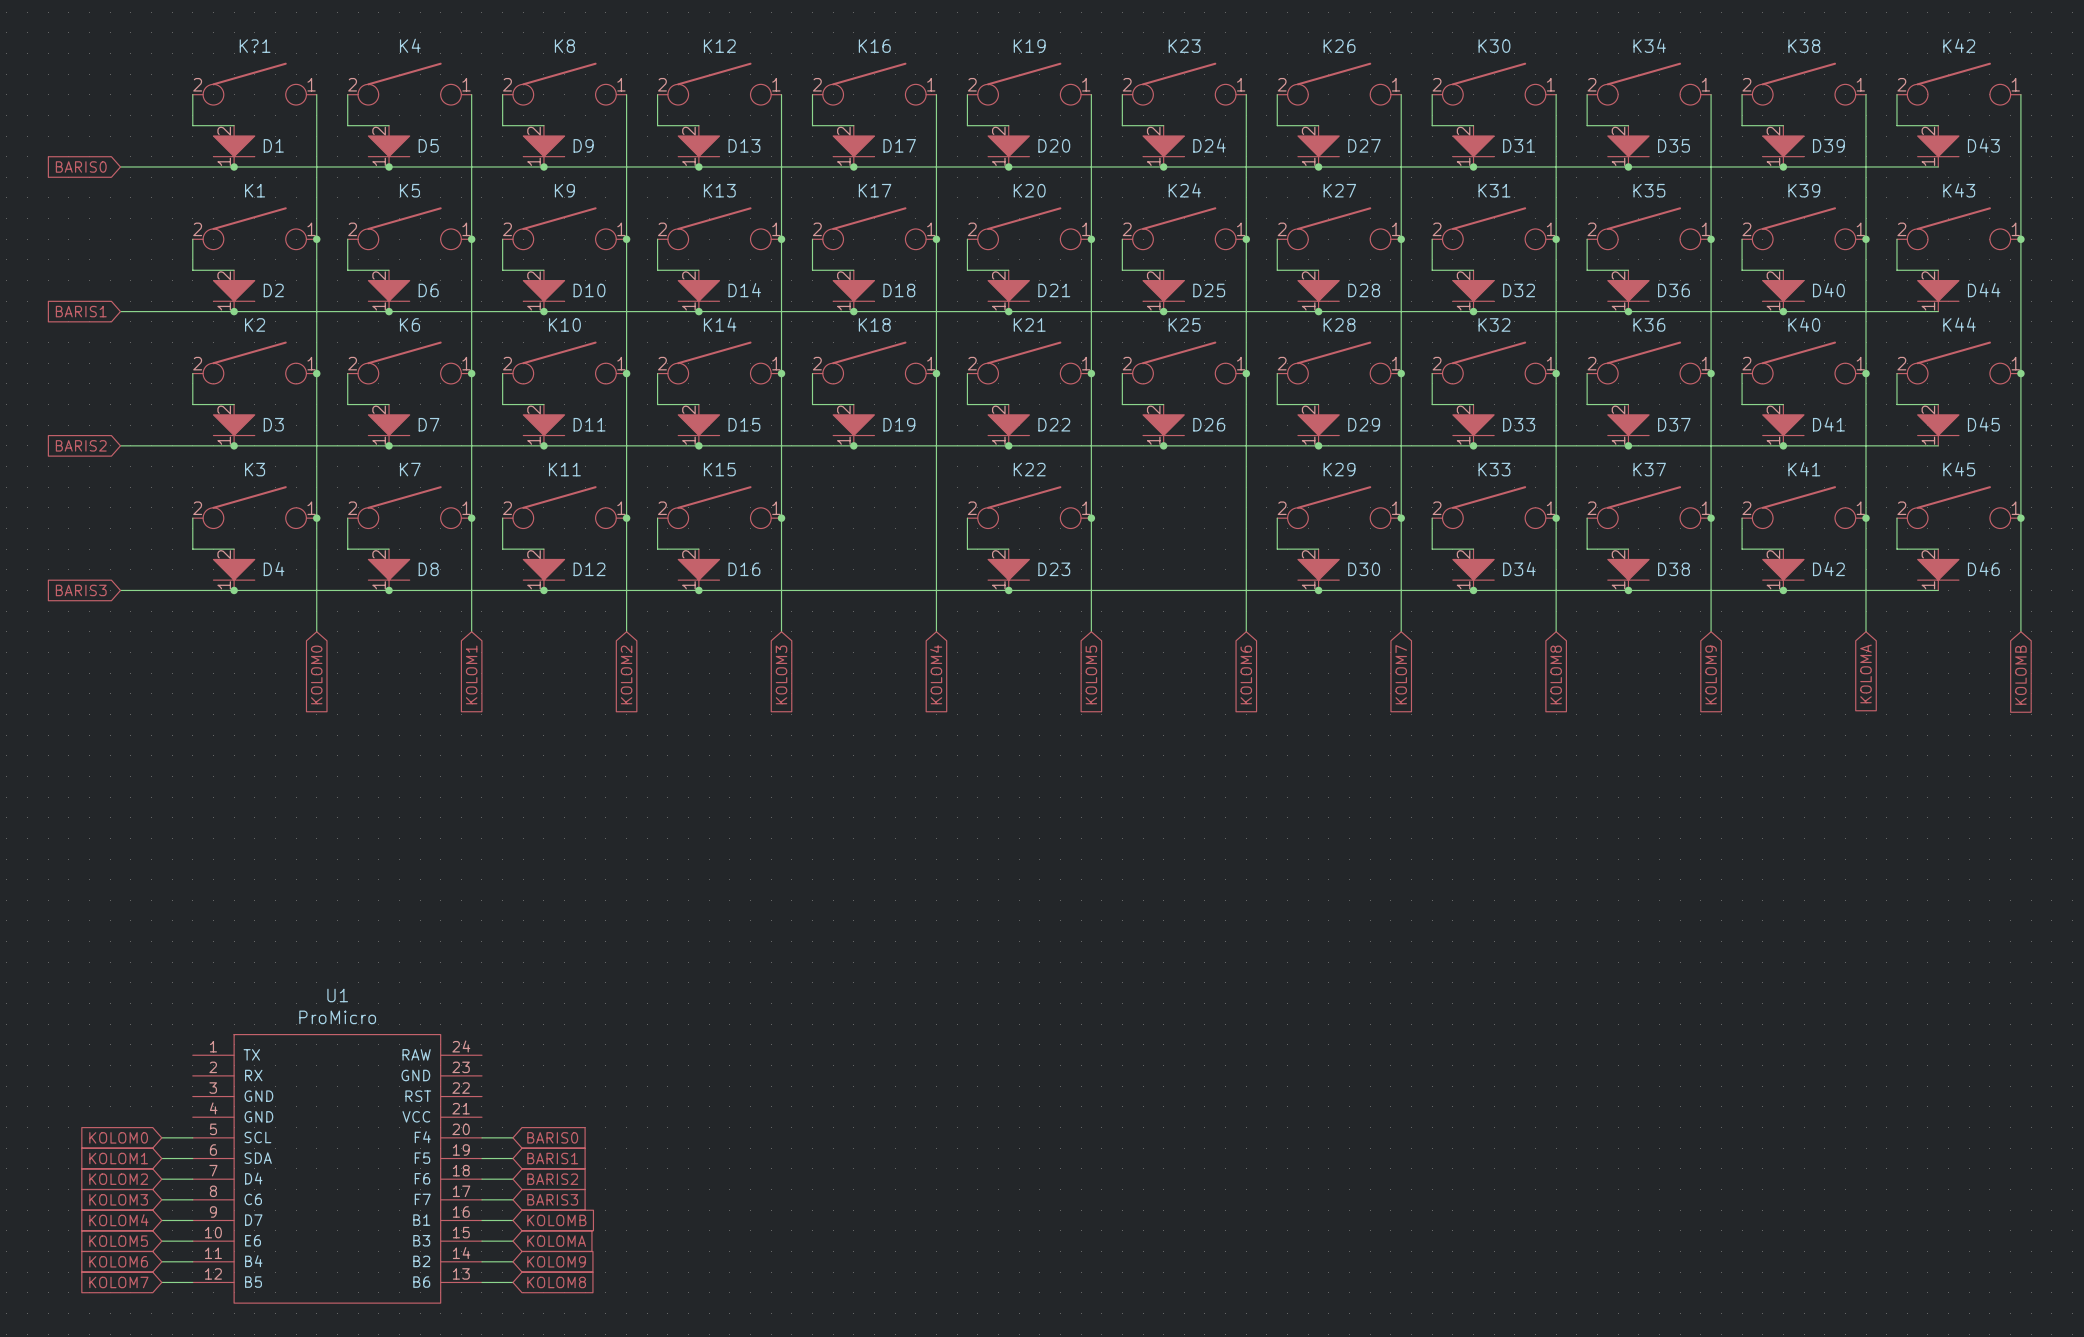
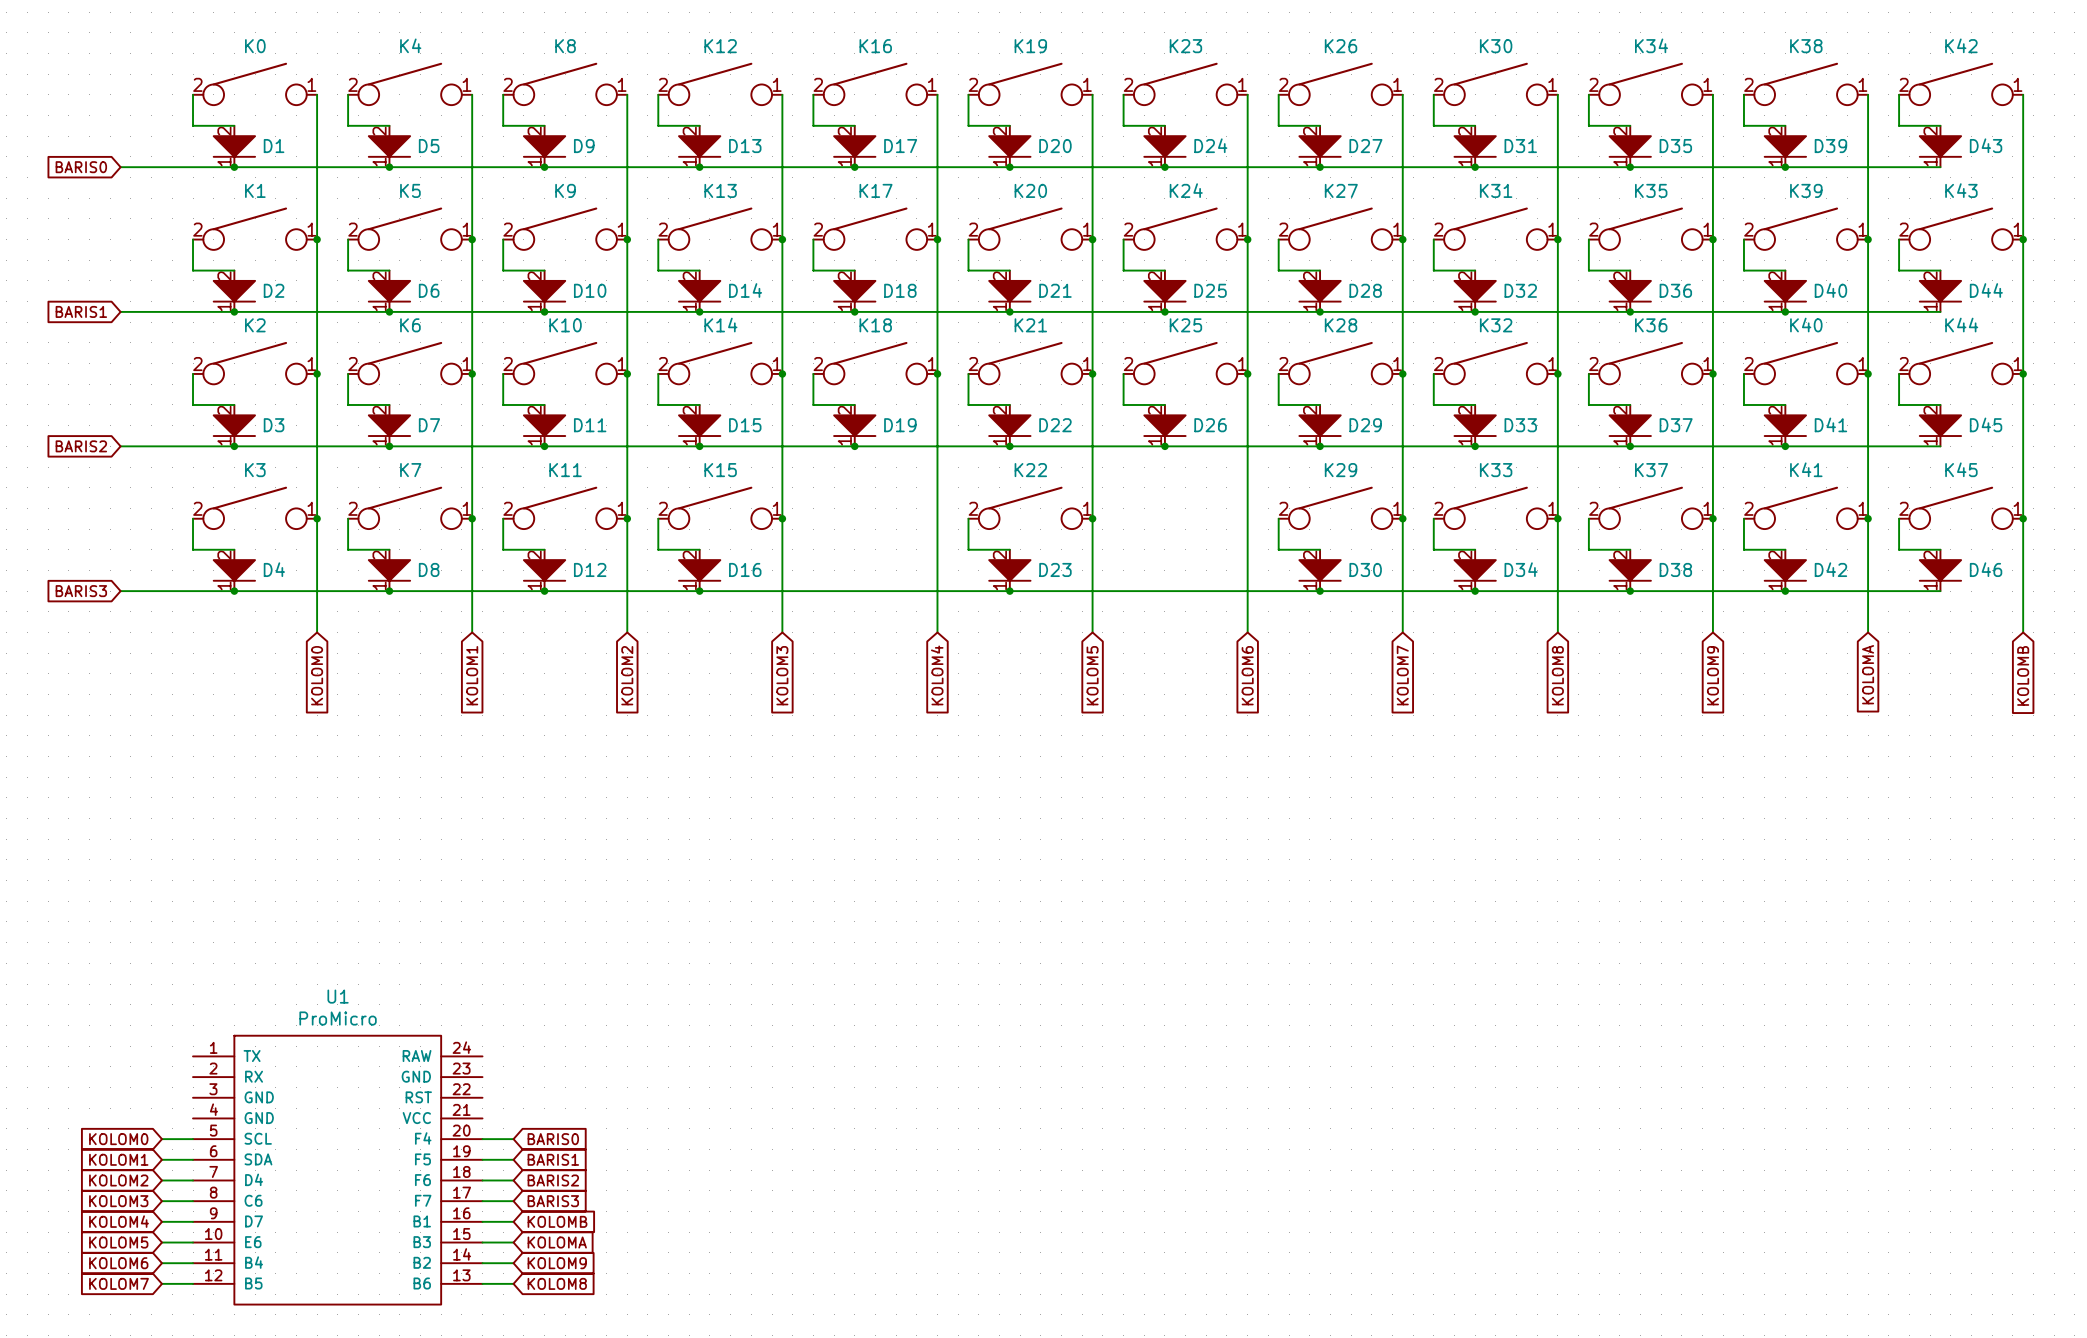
K?1 name: K?1 (255, 46) -> K0 (255, 46)

